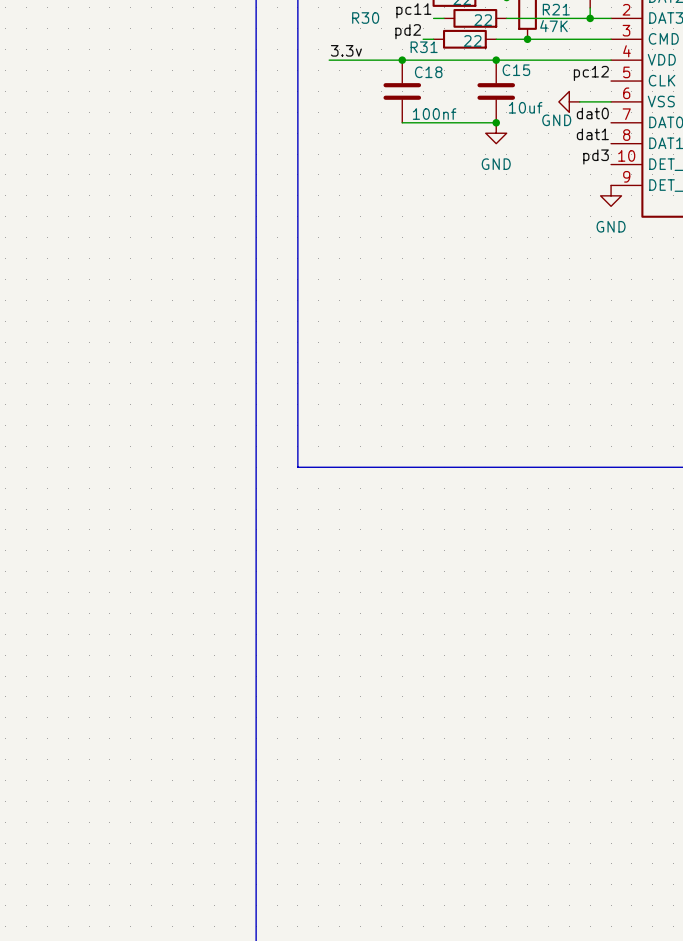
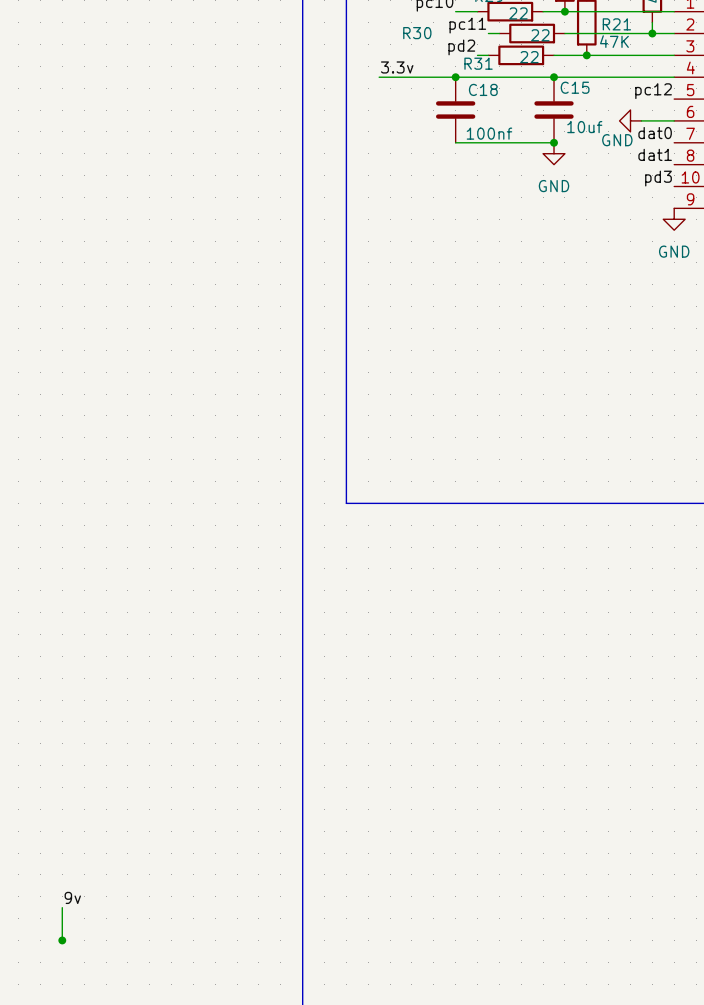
label: none -> 9v (72, 897)
wire: none -> (62, 907) (62, 940)
junction: none -> (62, 940)

